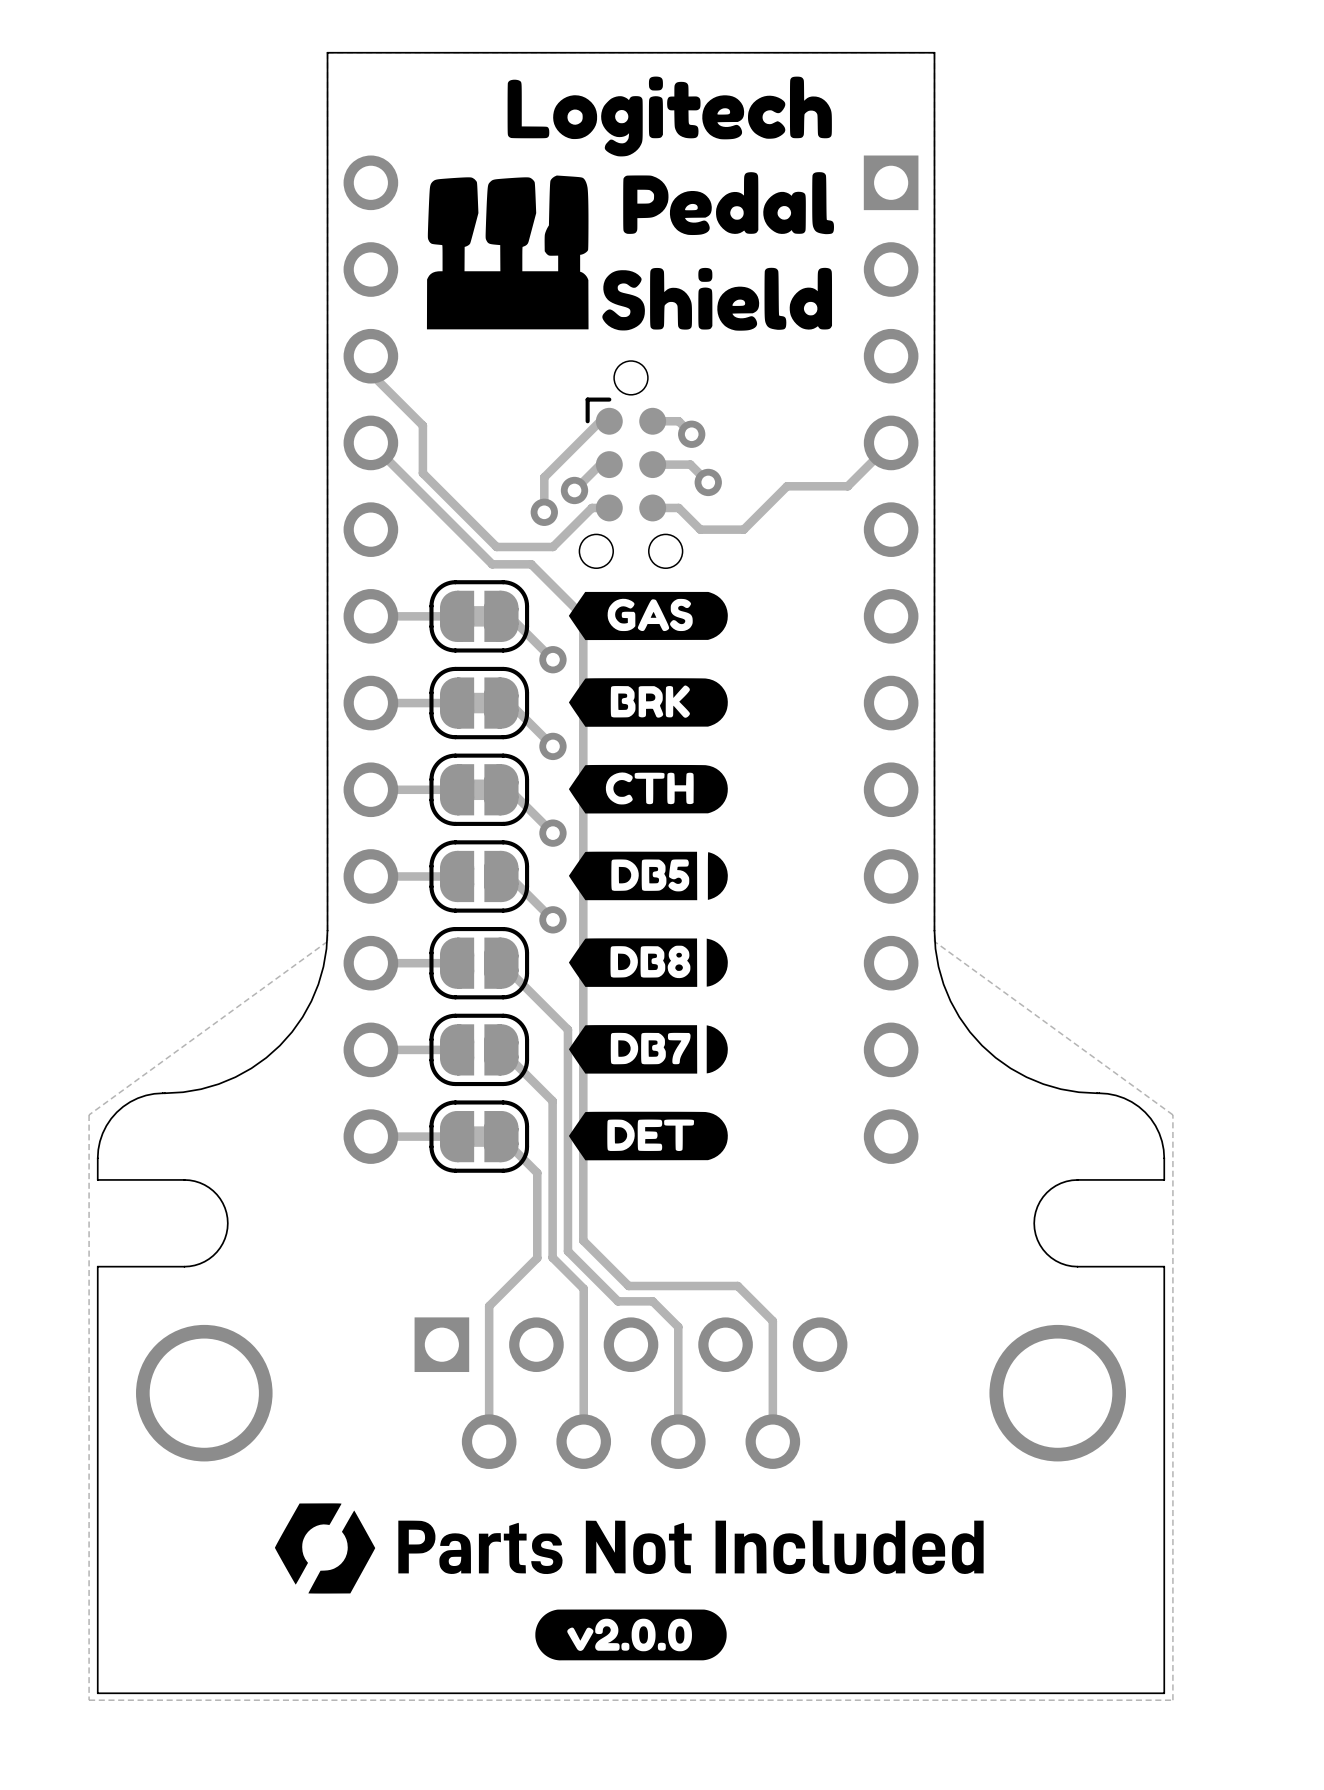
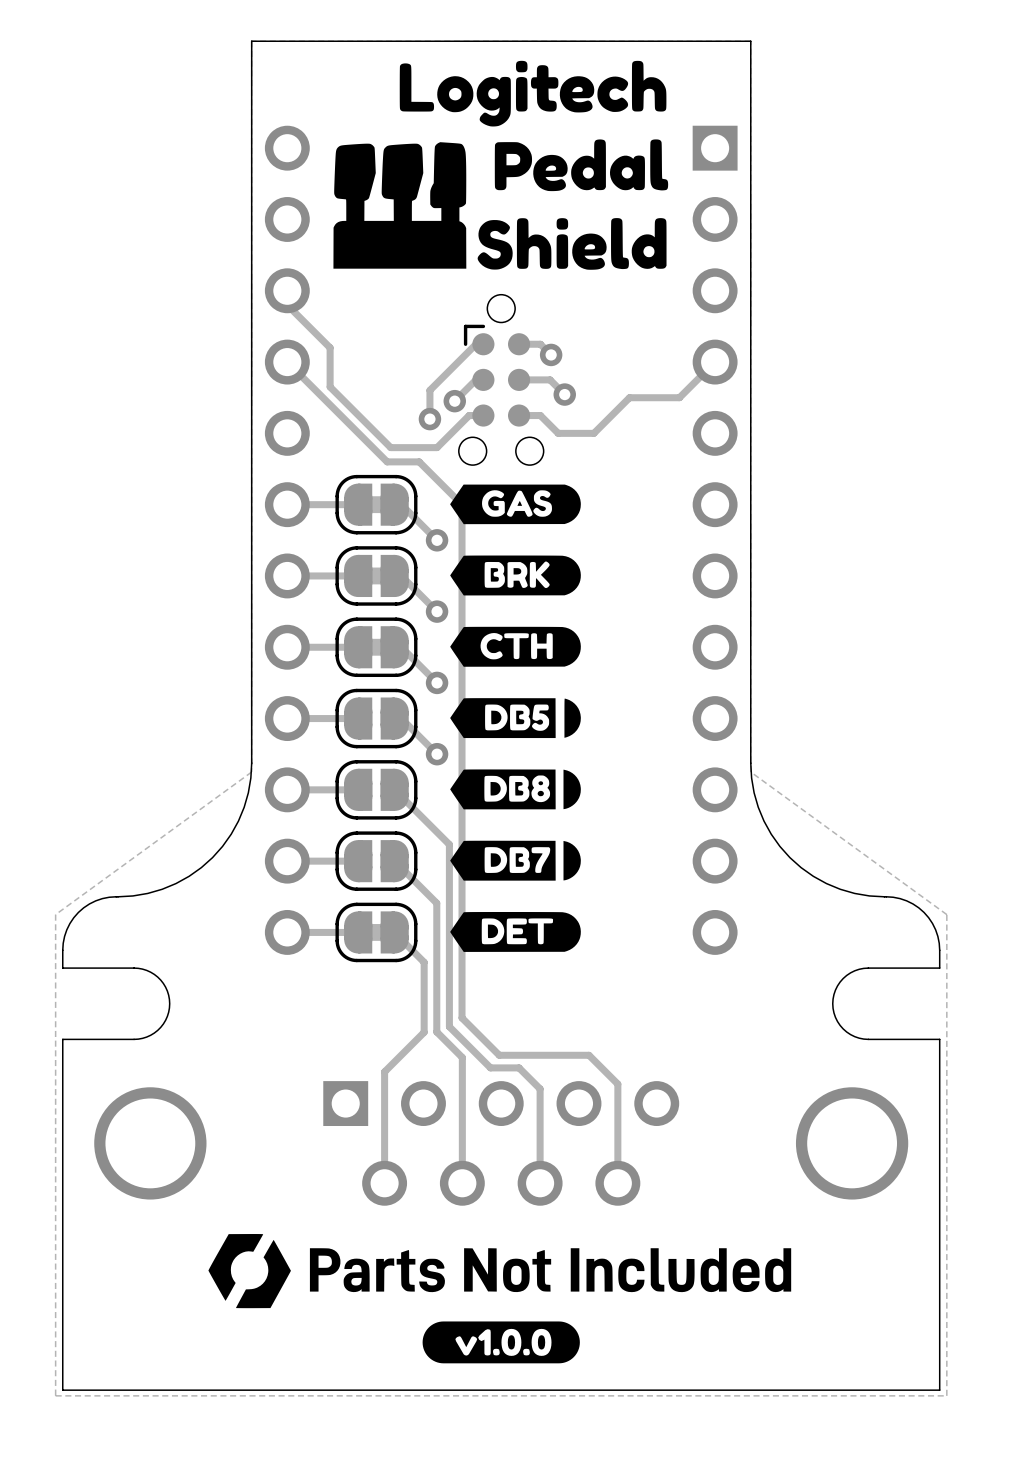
drawing shape: [535, 1609, 727, 1661] -> [422, 1321, 580, 1364]

